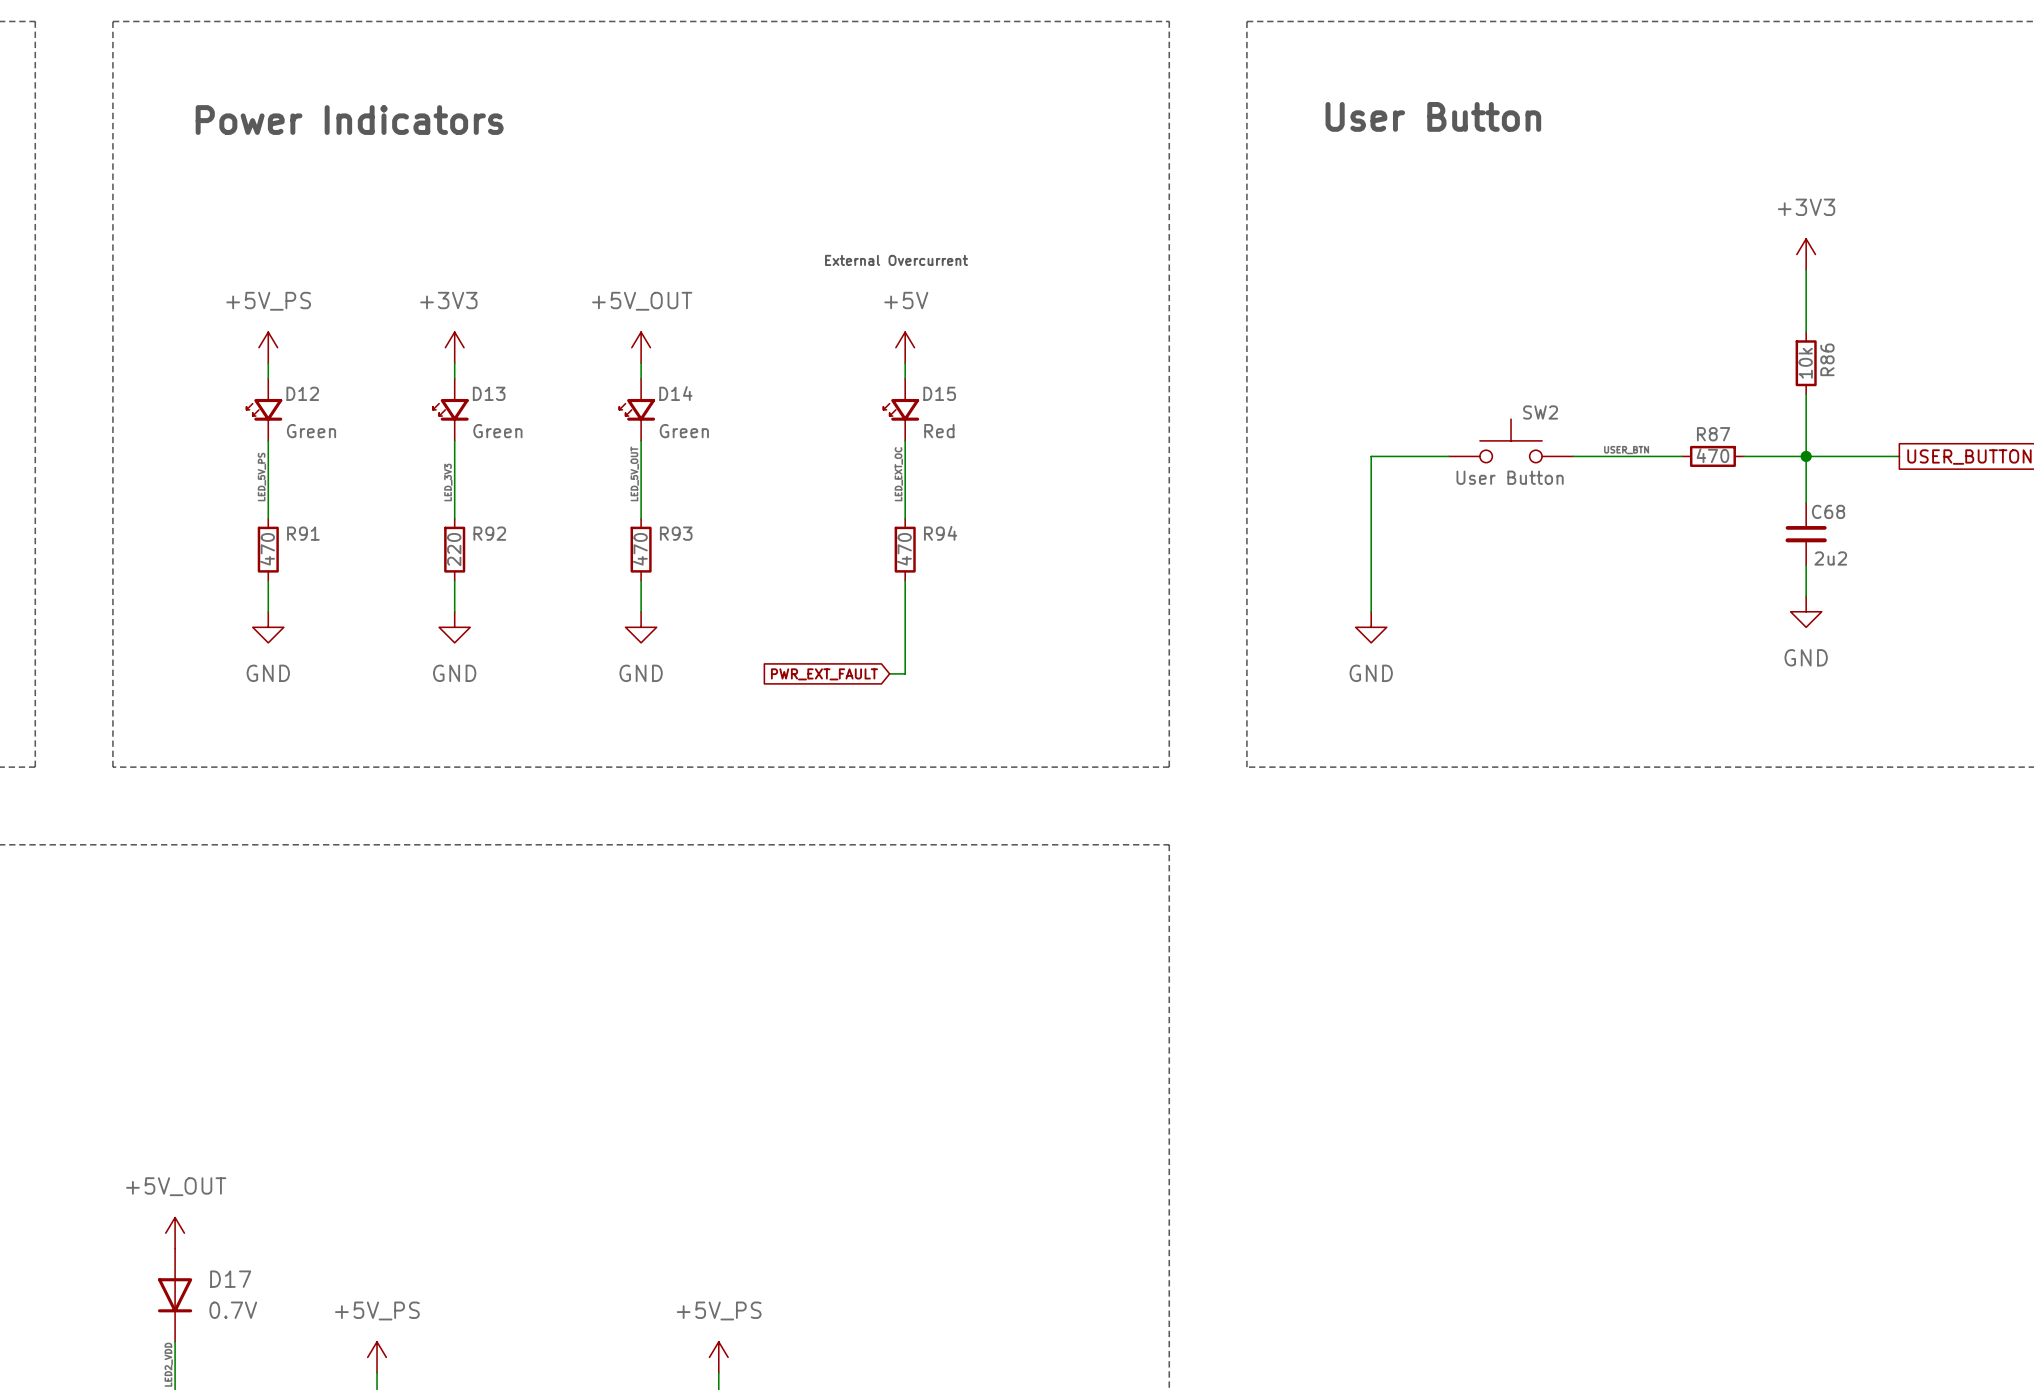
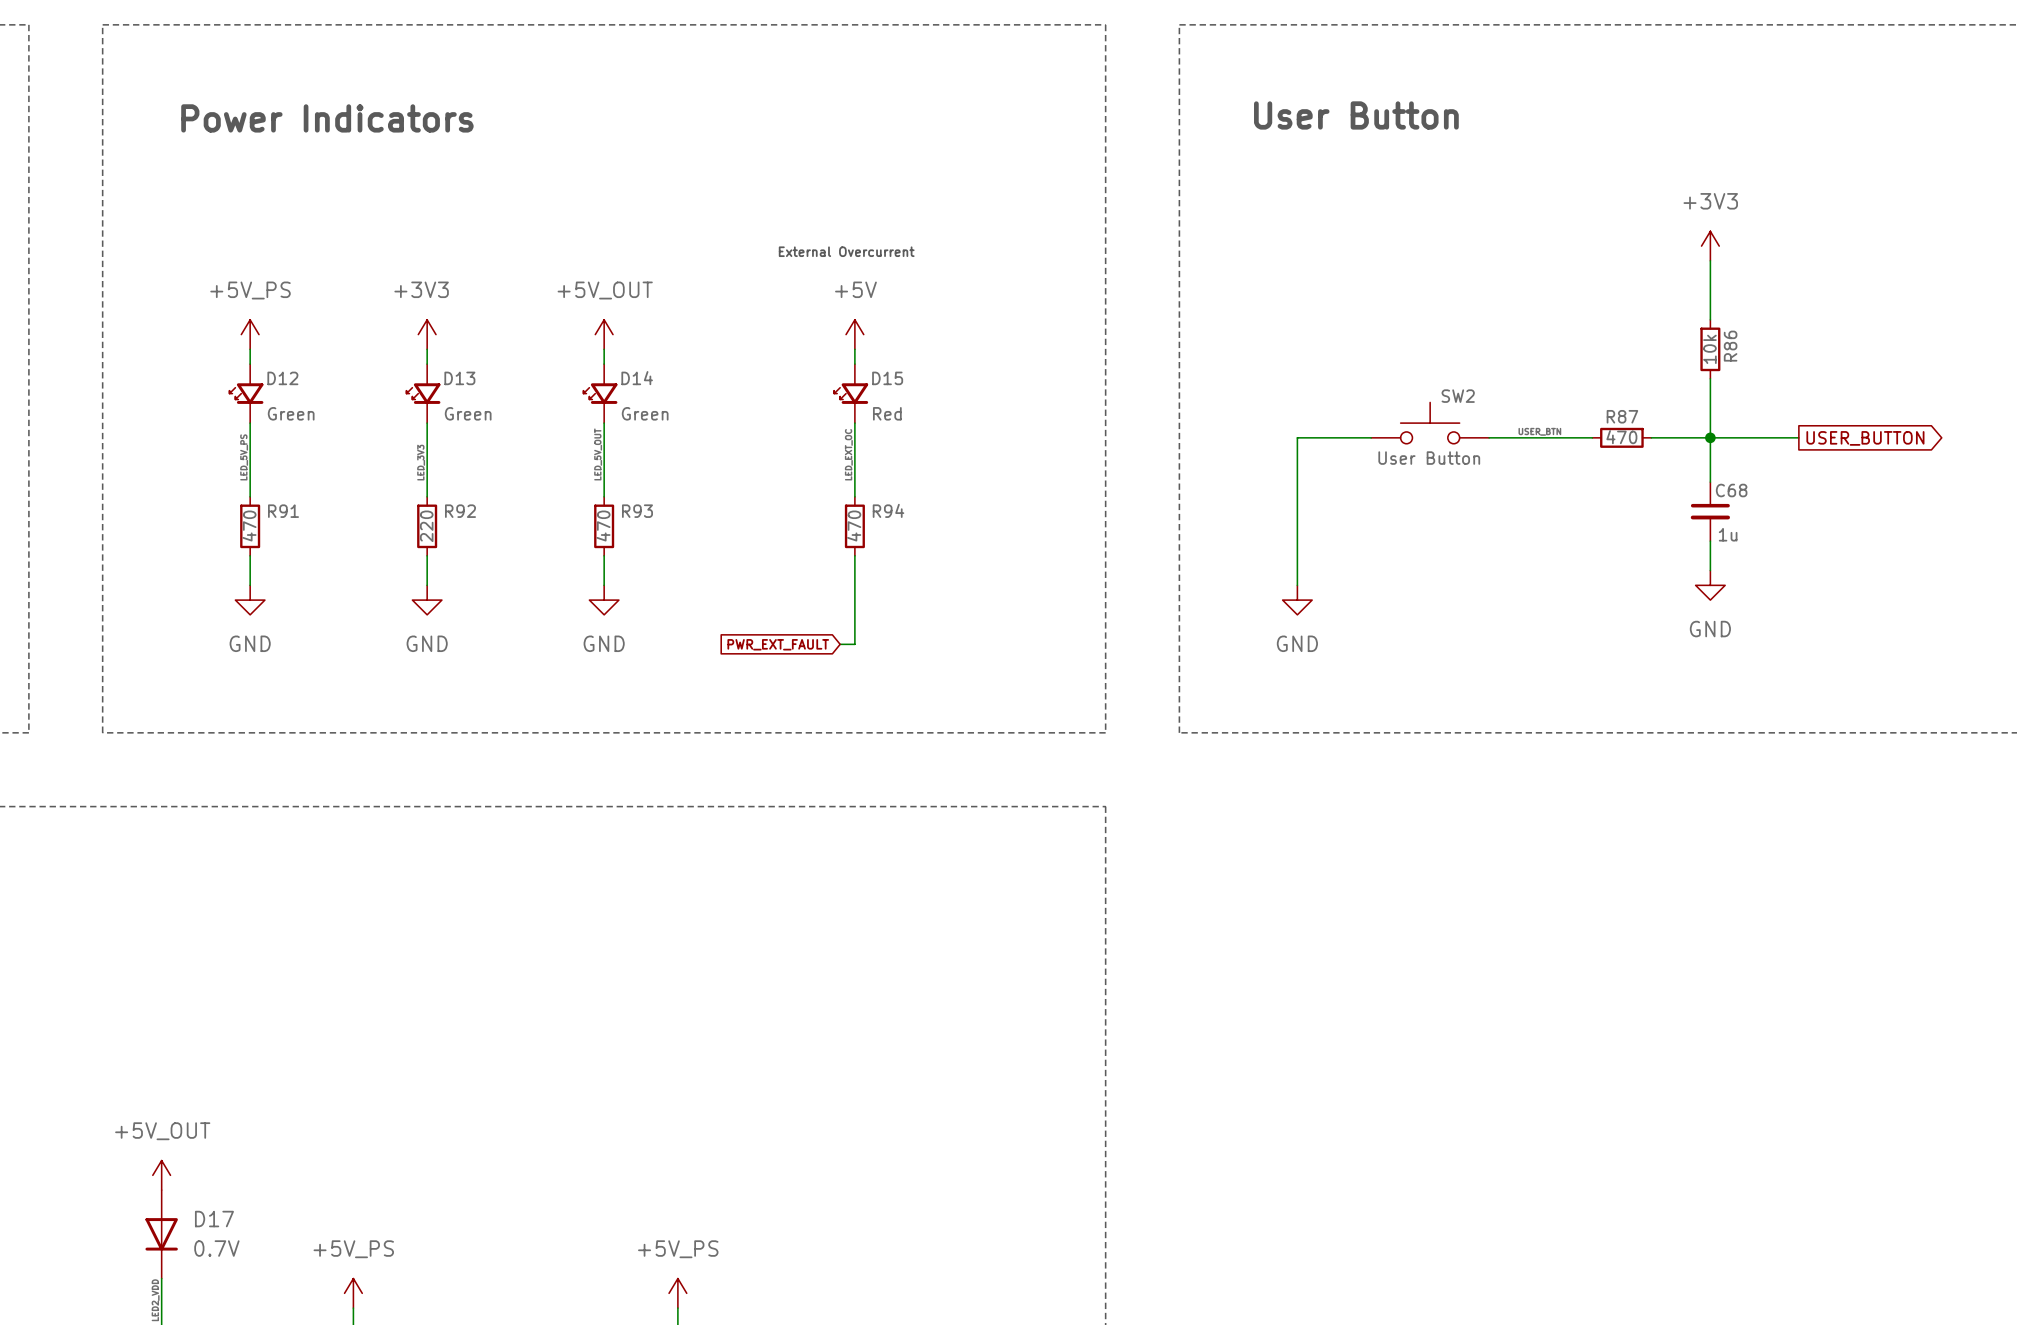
C68 value: 2u2 (1830, 558) -> 1u (1728, 534)

